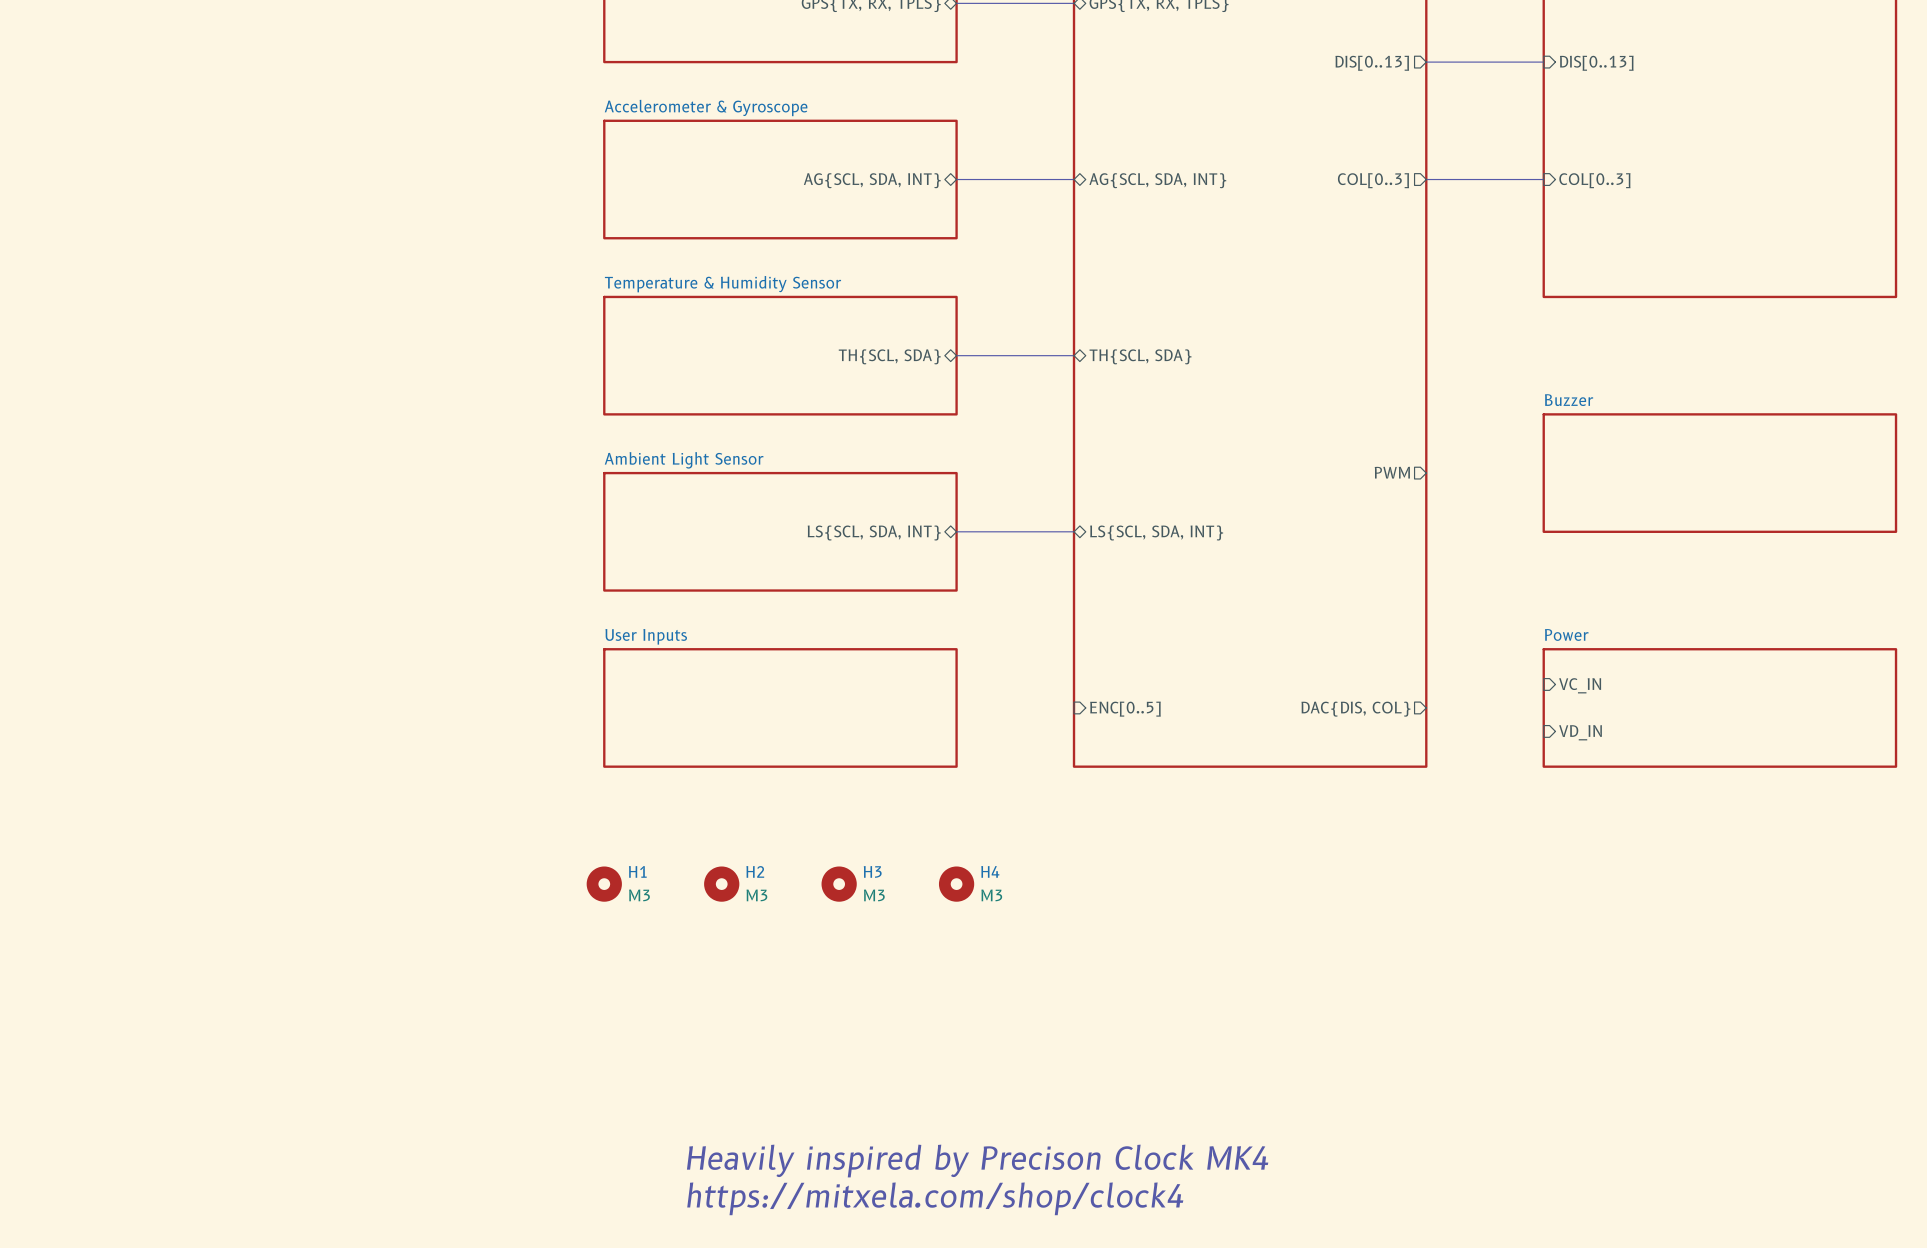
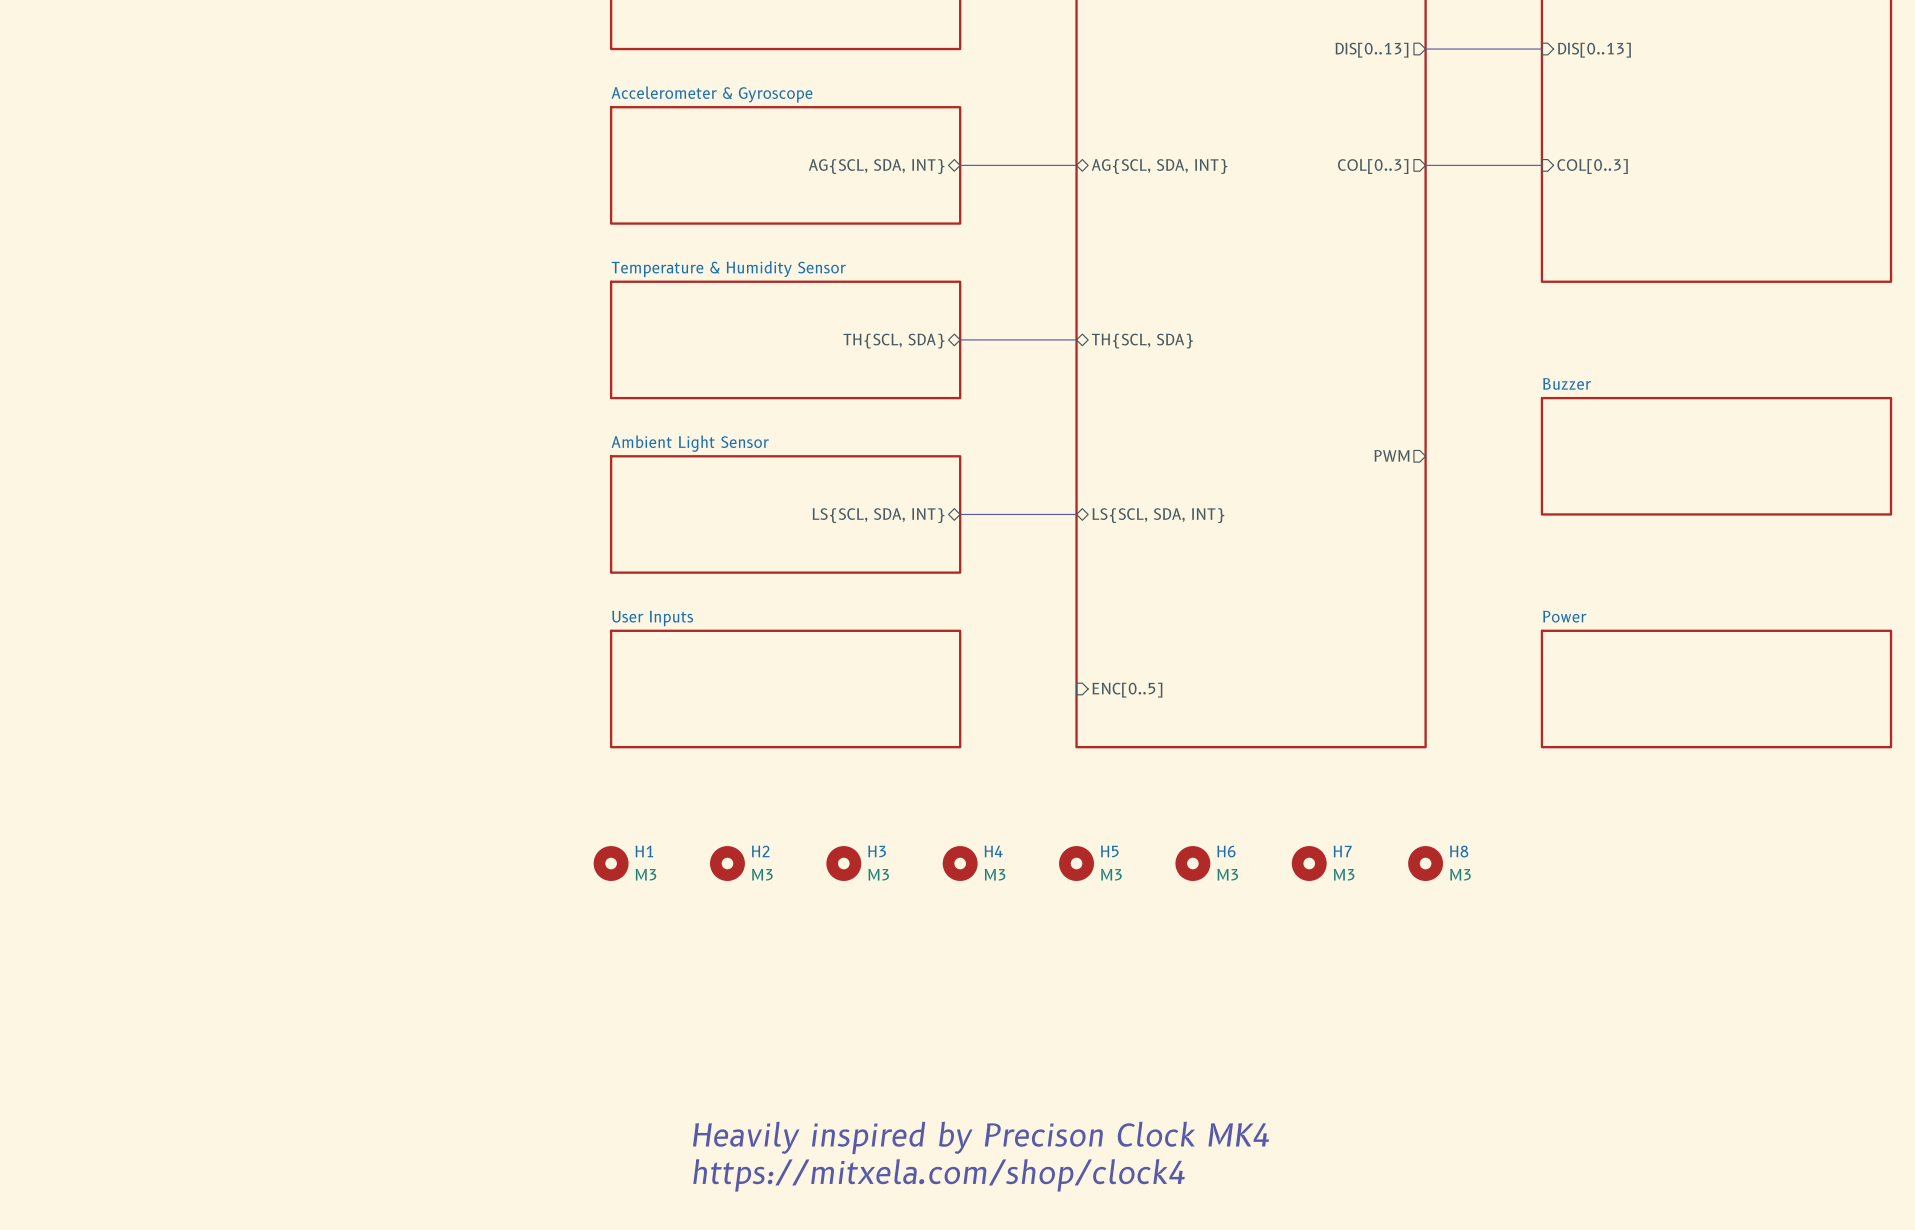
sheet pin: VC_IN (1580, 685) -> none
sheet pin: DAC{DIS, COL} (1355, 709) -> none
sheet pin: VD_IN (1580, 732) -> none
H5: none -> M3 (1076, 863)
H6: none -> M3 (1192, 863)
H7: none -> M3 (1309, 863)
H8: none -> M3 (1425, 863)

